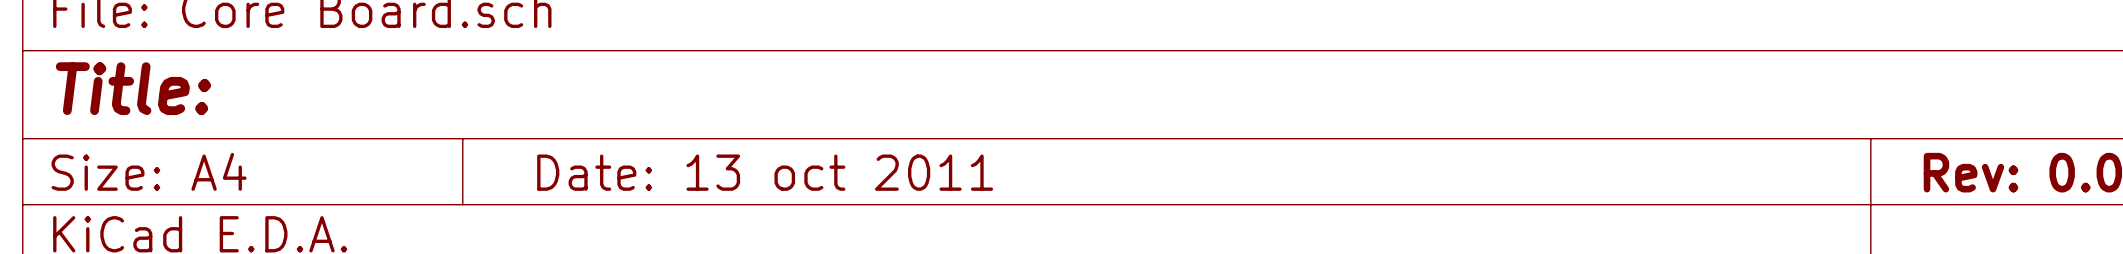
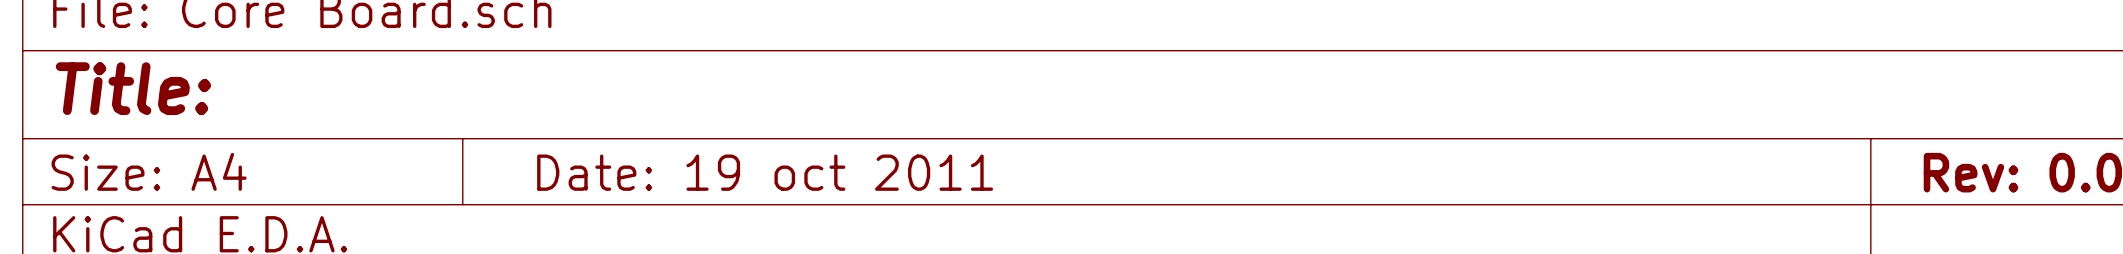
title block: Date: 13 oct 2011 (765, 172) -> Date: 19 oct 2011 (765, 172)

